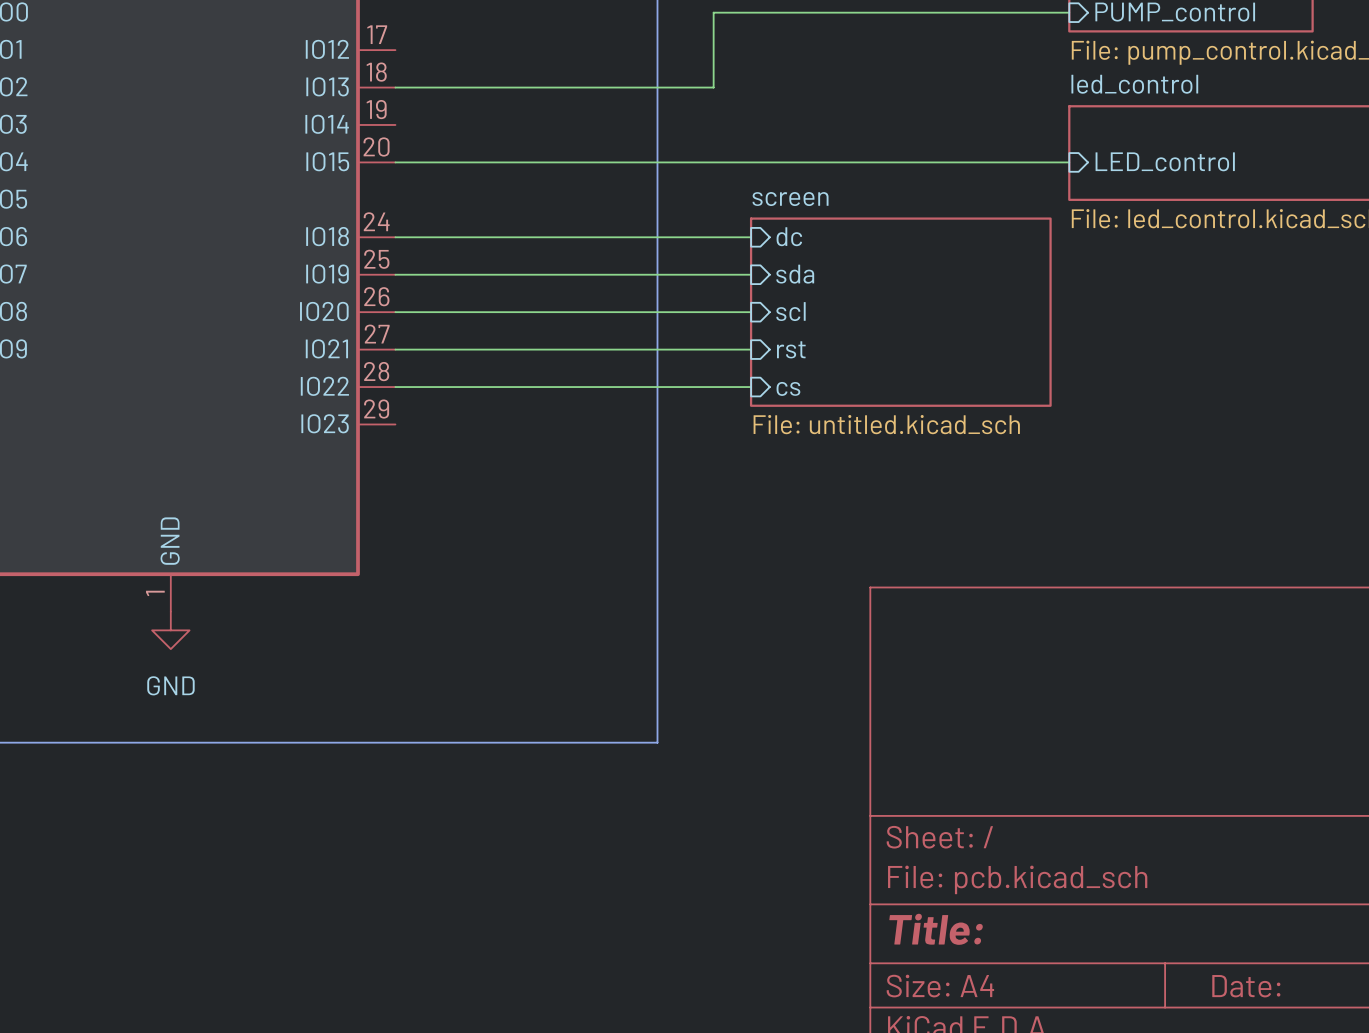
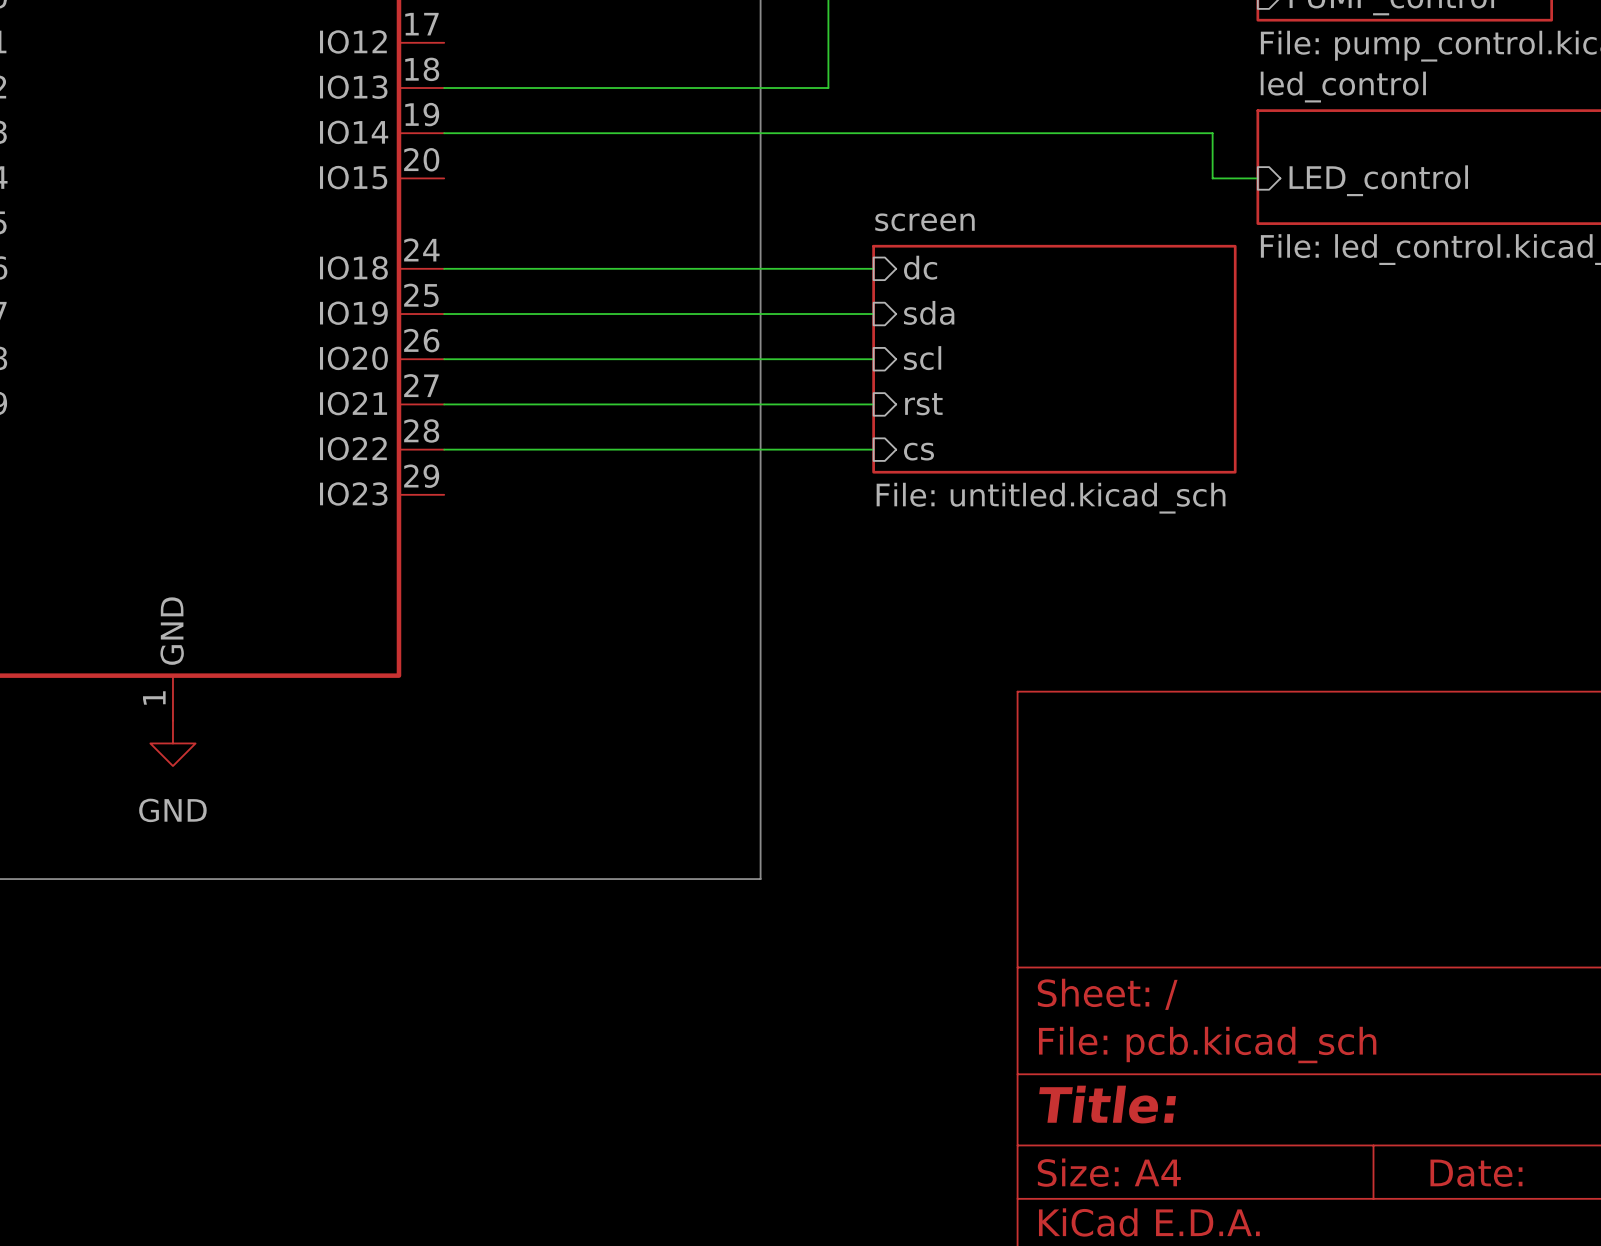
wire: (395, 162) (1031, 162) -> (444, 133) (1212, 133) (1212, 178)

